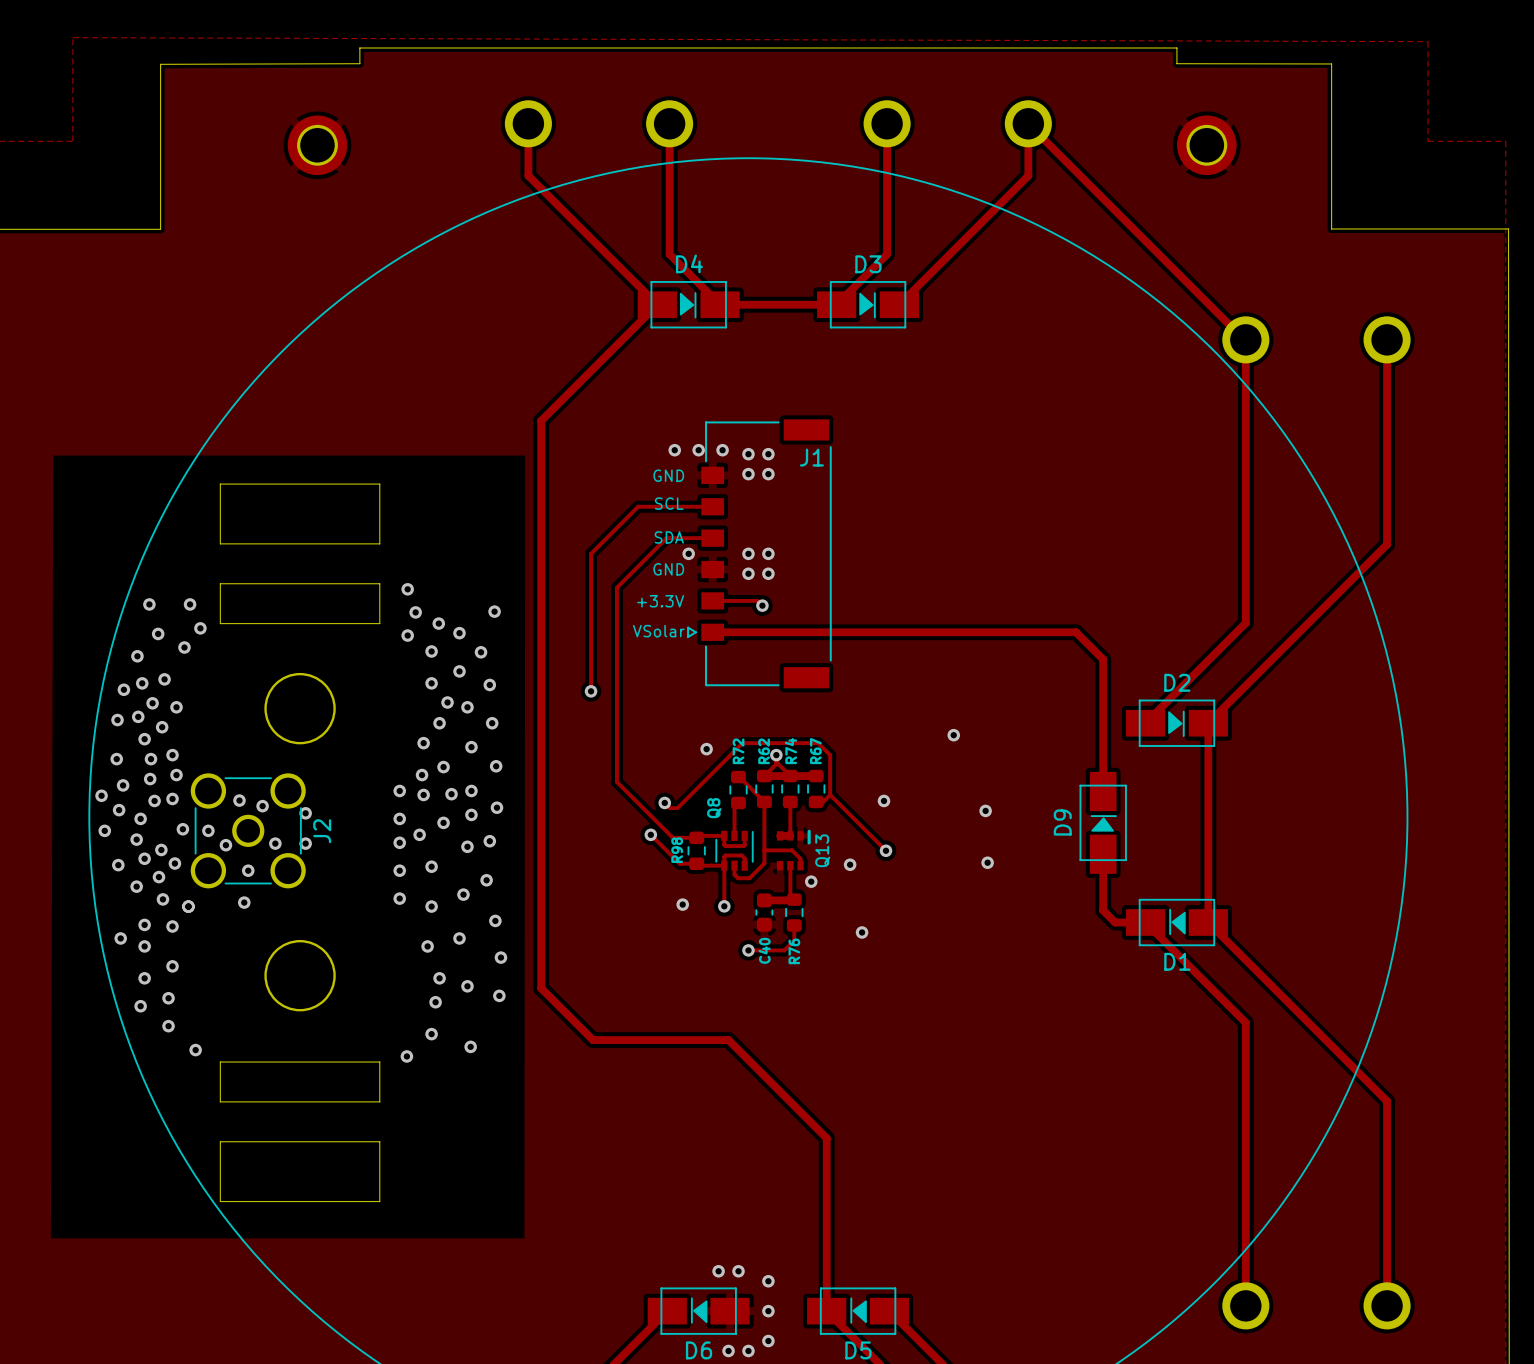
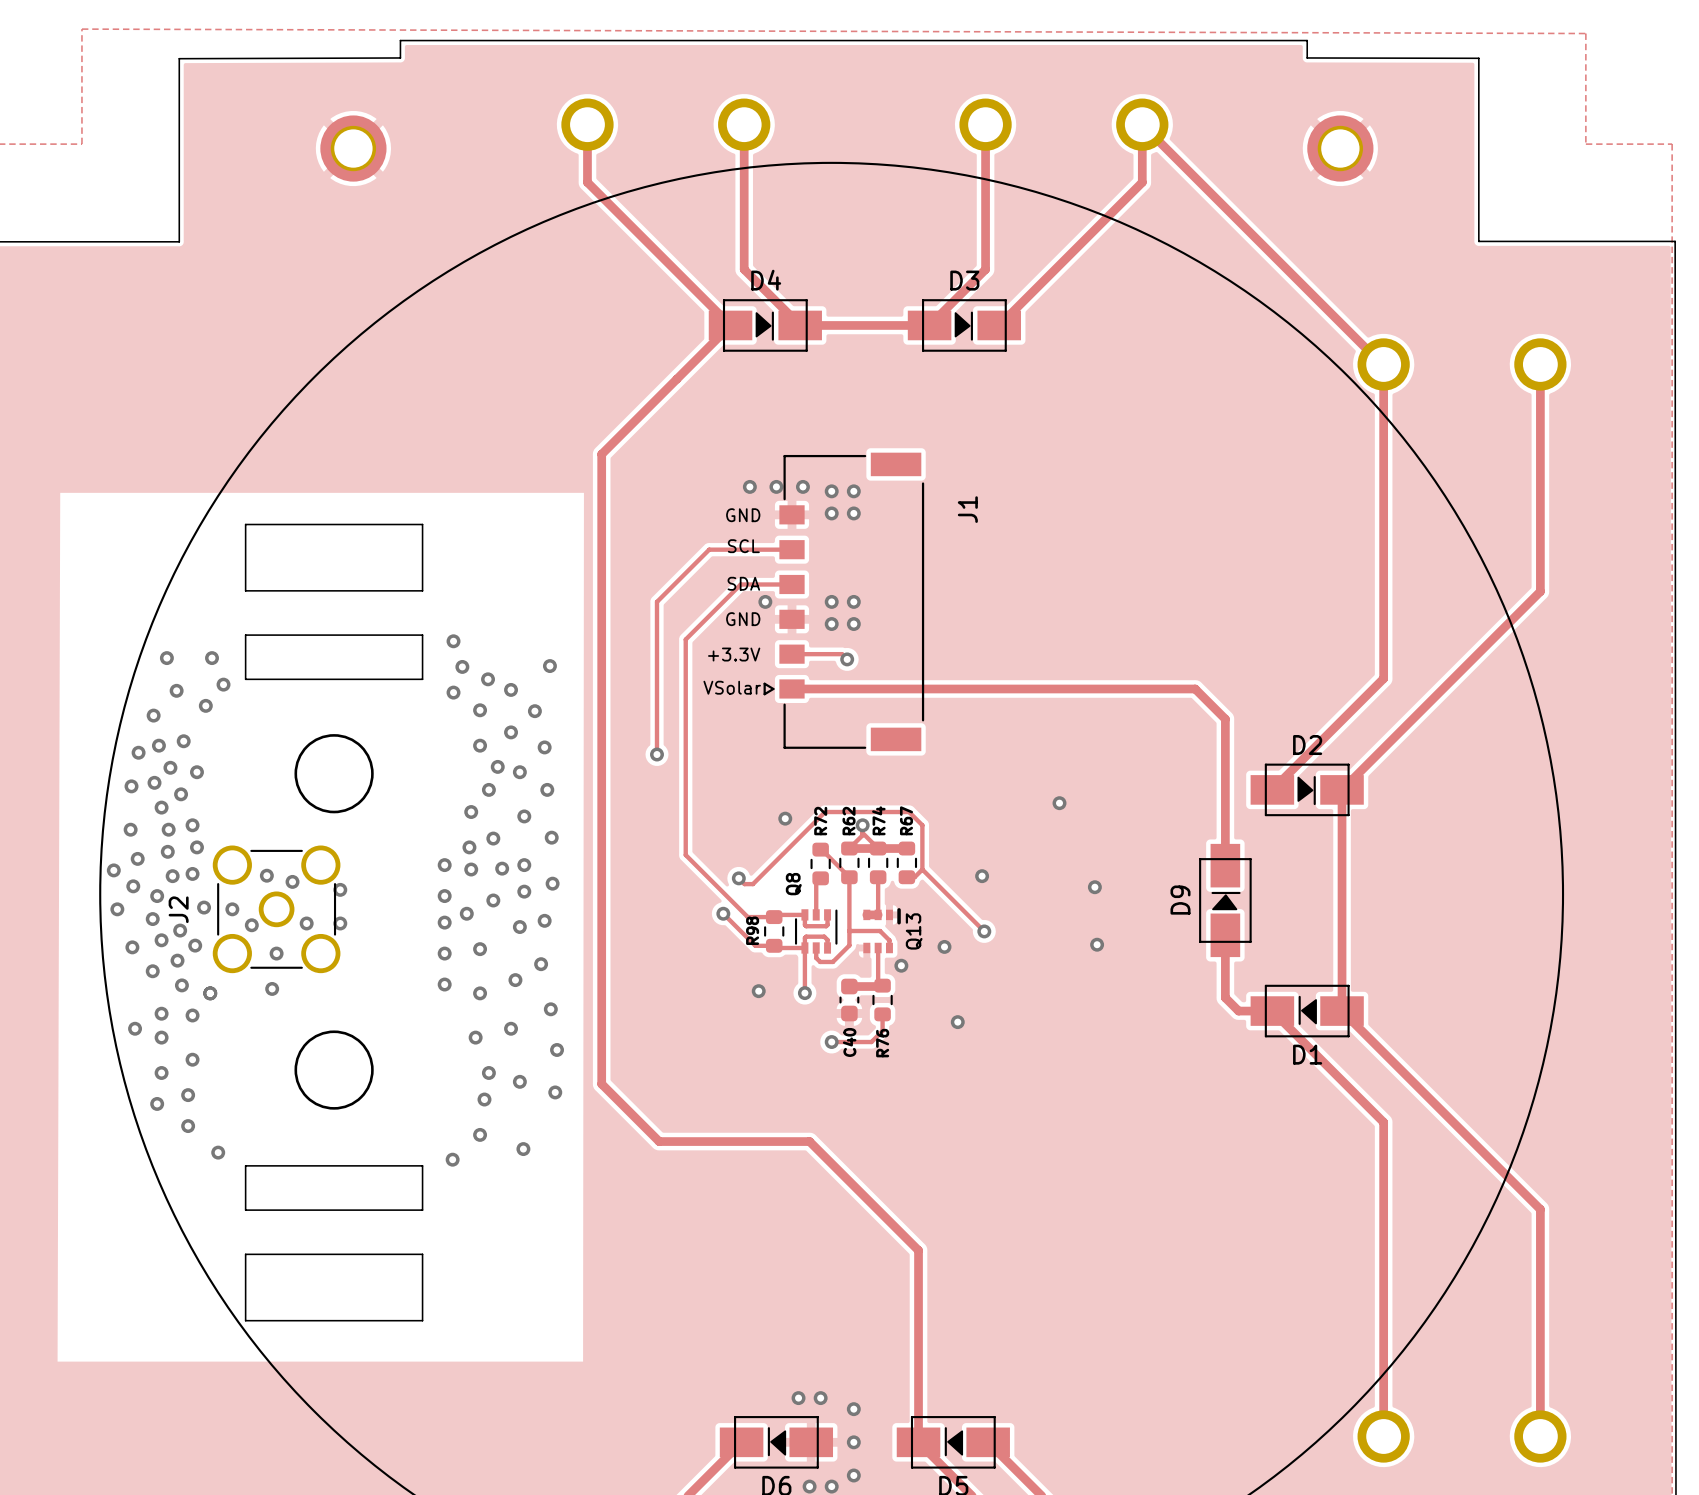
J1 name rotation: 0° (811, 457) -> 90° counterclockwise (967, 509)
J1 name position: J1 (811, 457) -> J1 (967, 509)
J2 name position: J2 (322, 831) -> J2 (178, 909)

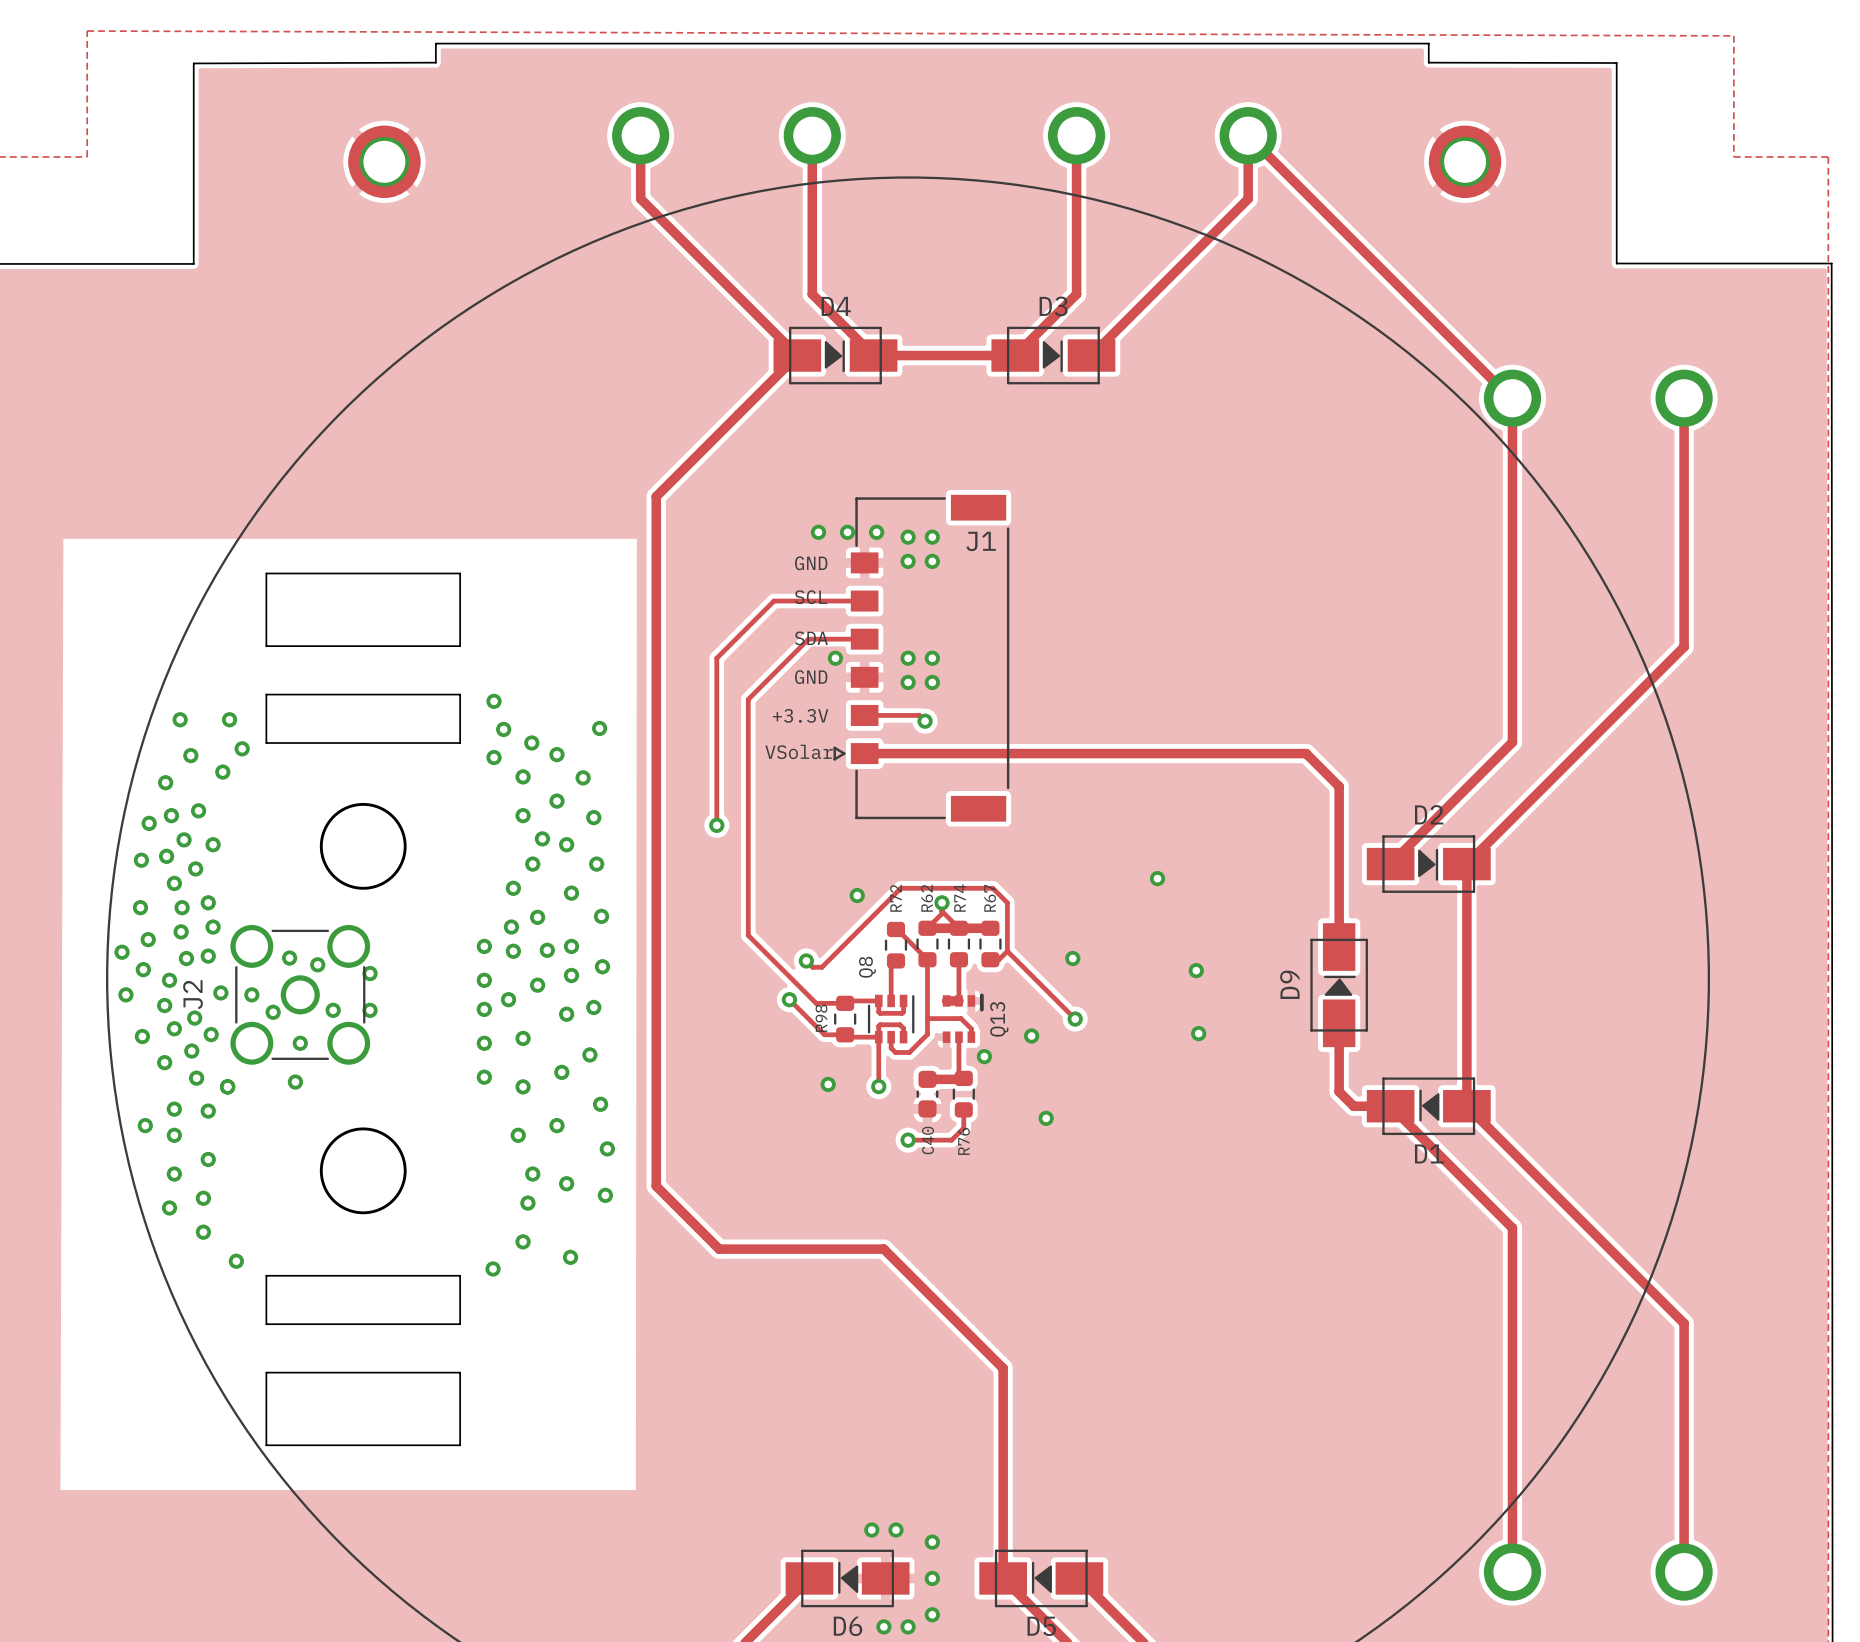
J1 name rotation: 0° (967, 509) -> 90° clockwise (981, 541)
J1 name position: J1 (967, 509) -> J1 (981, 541)

